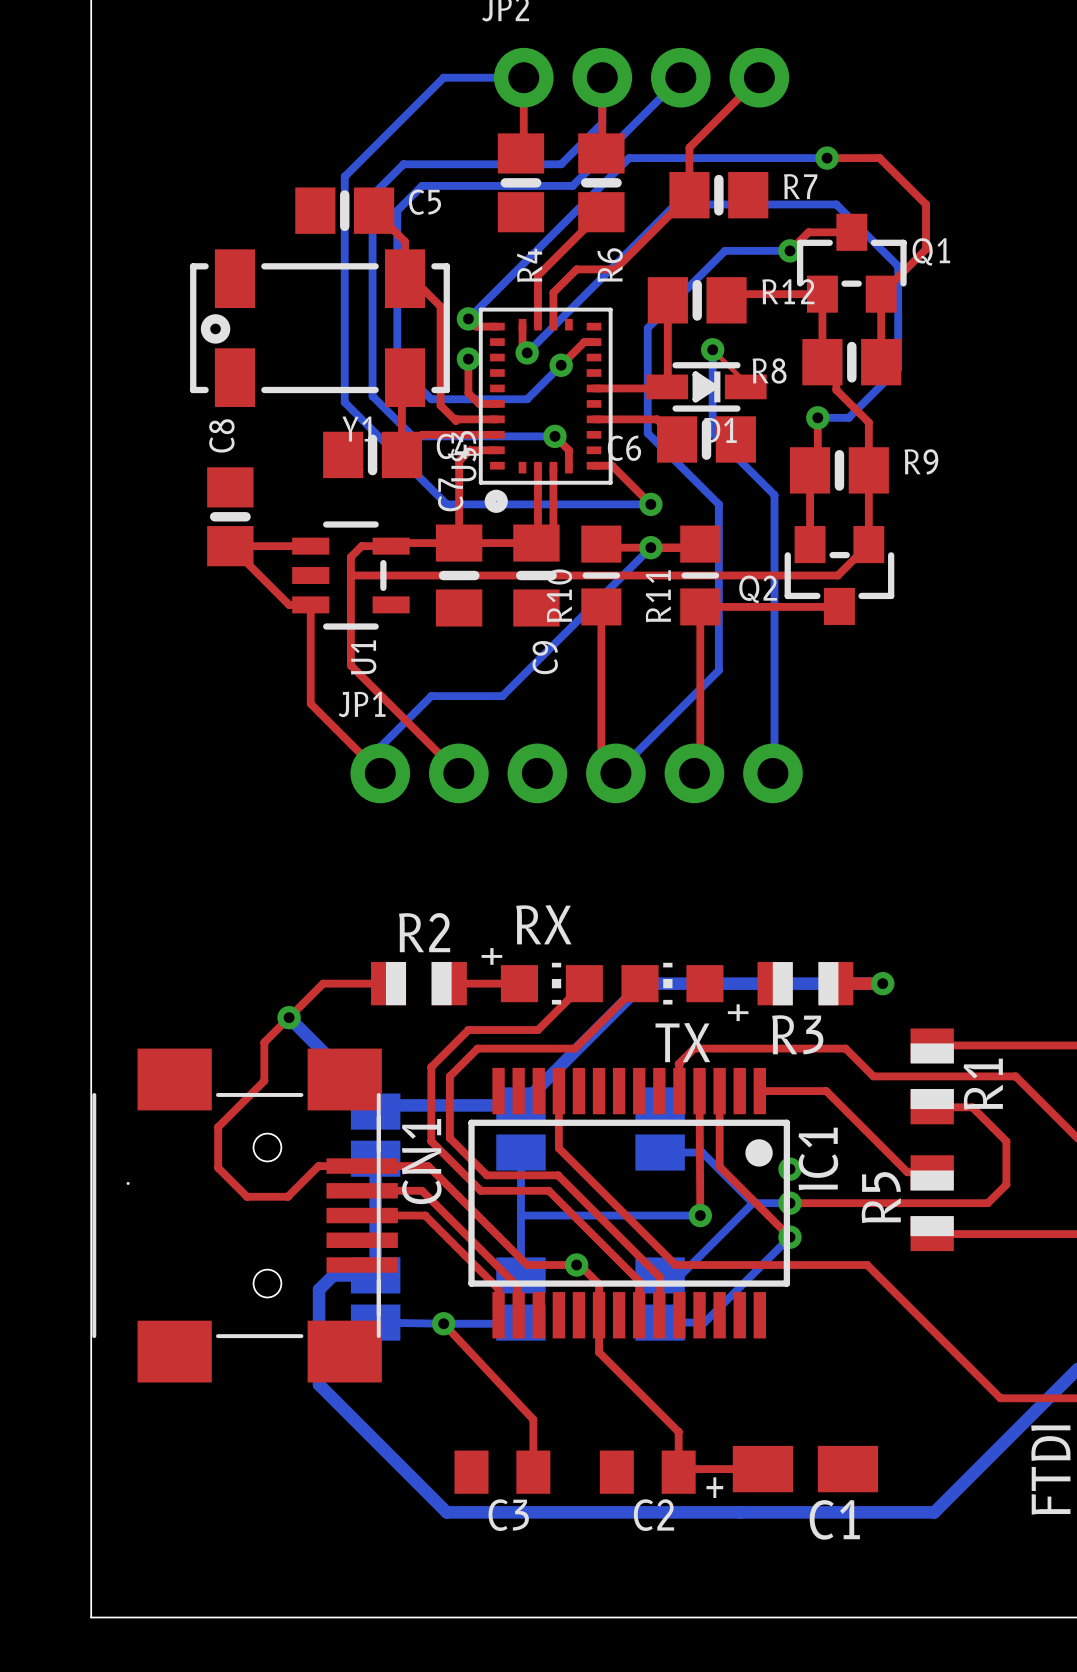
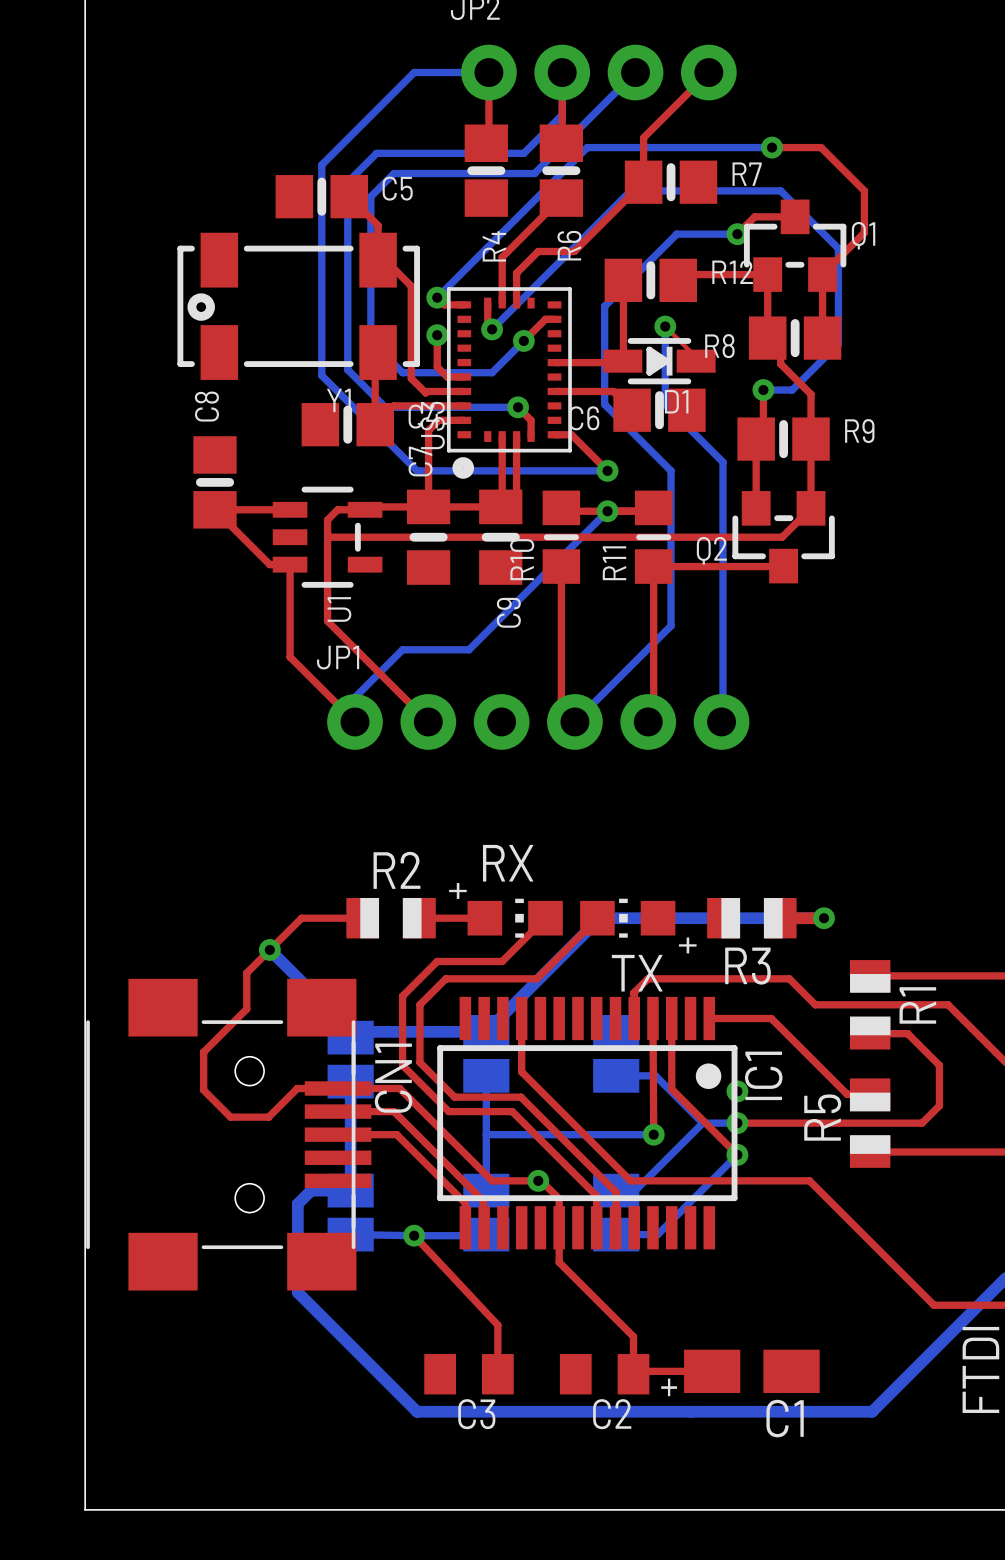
CN1 footprint: [92, 1048, 398, 1383] -> [86, 978, 372, 1291]

